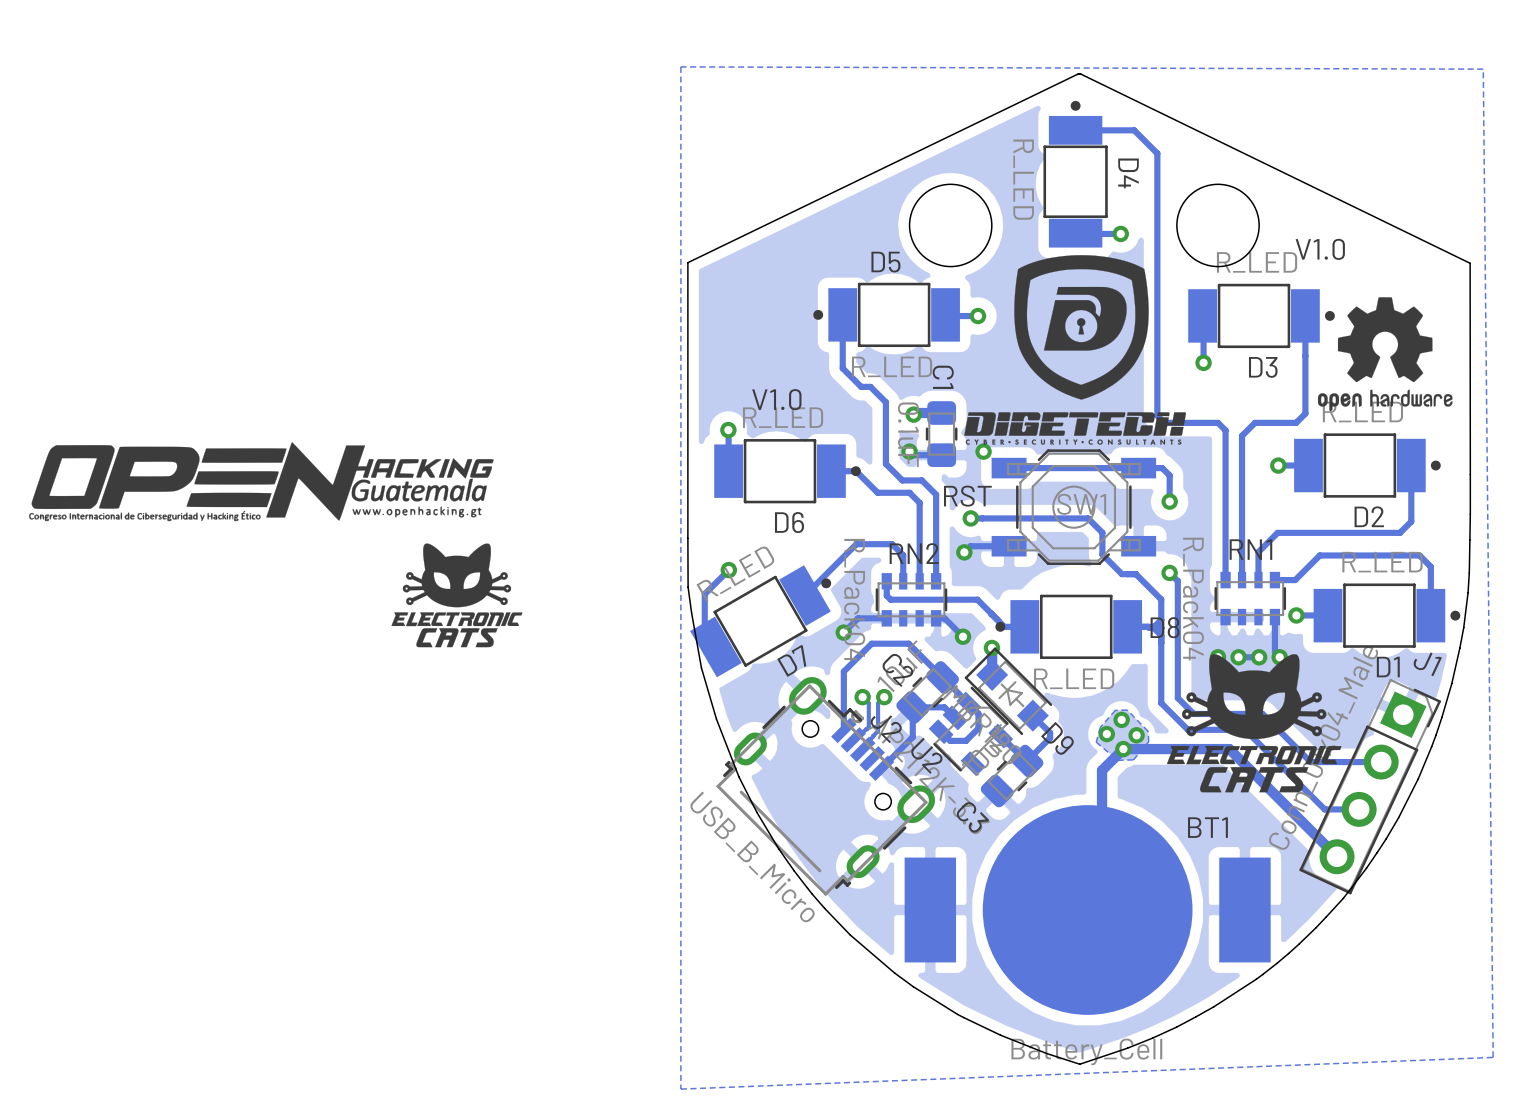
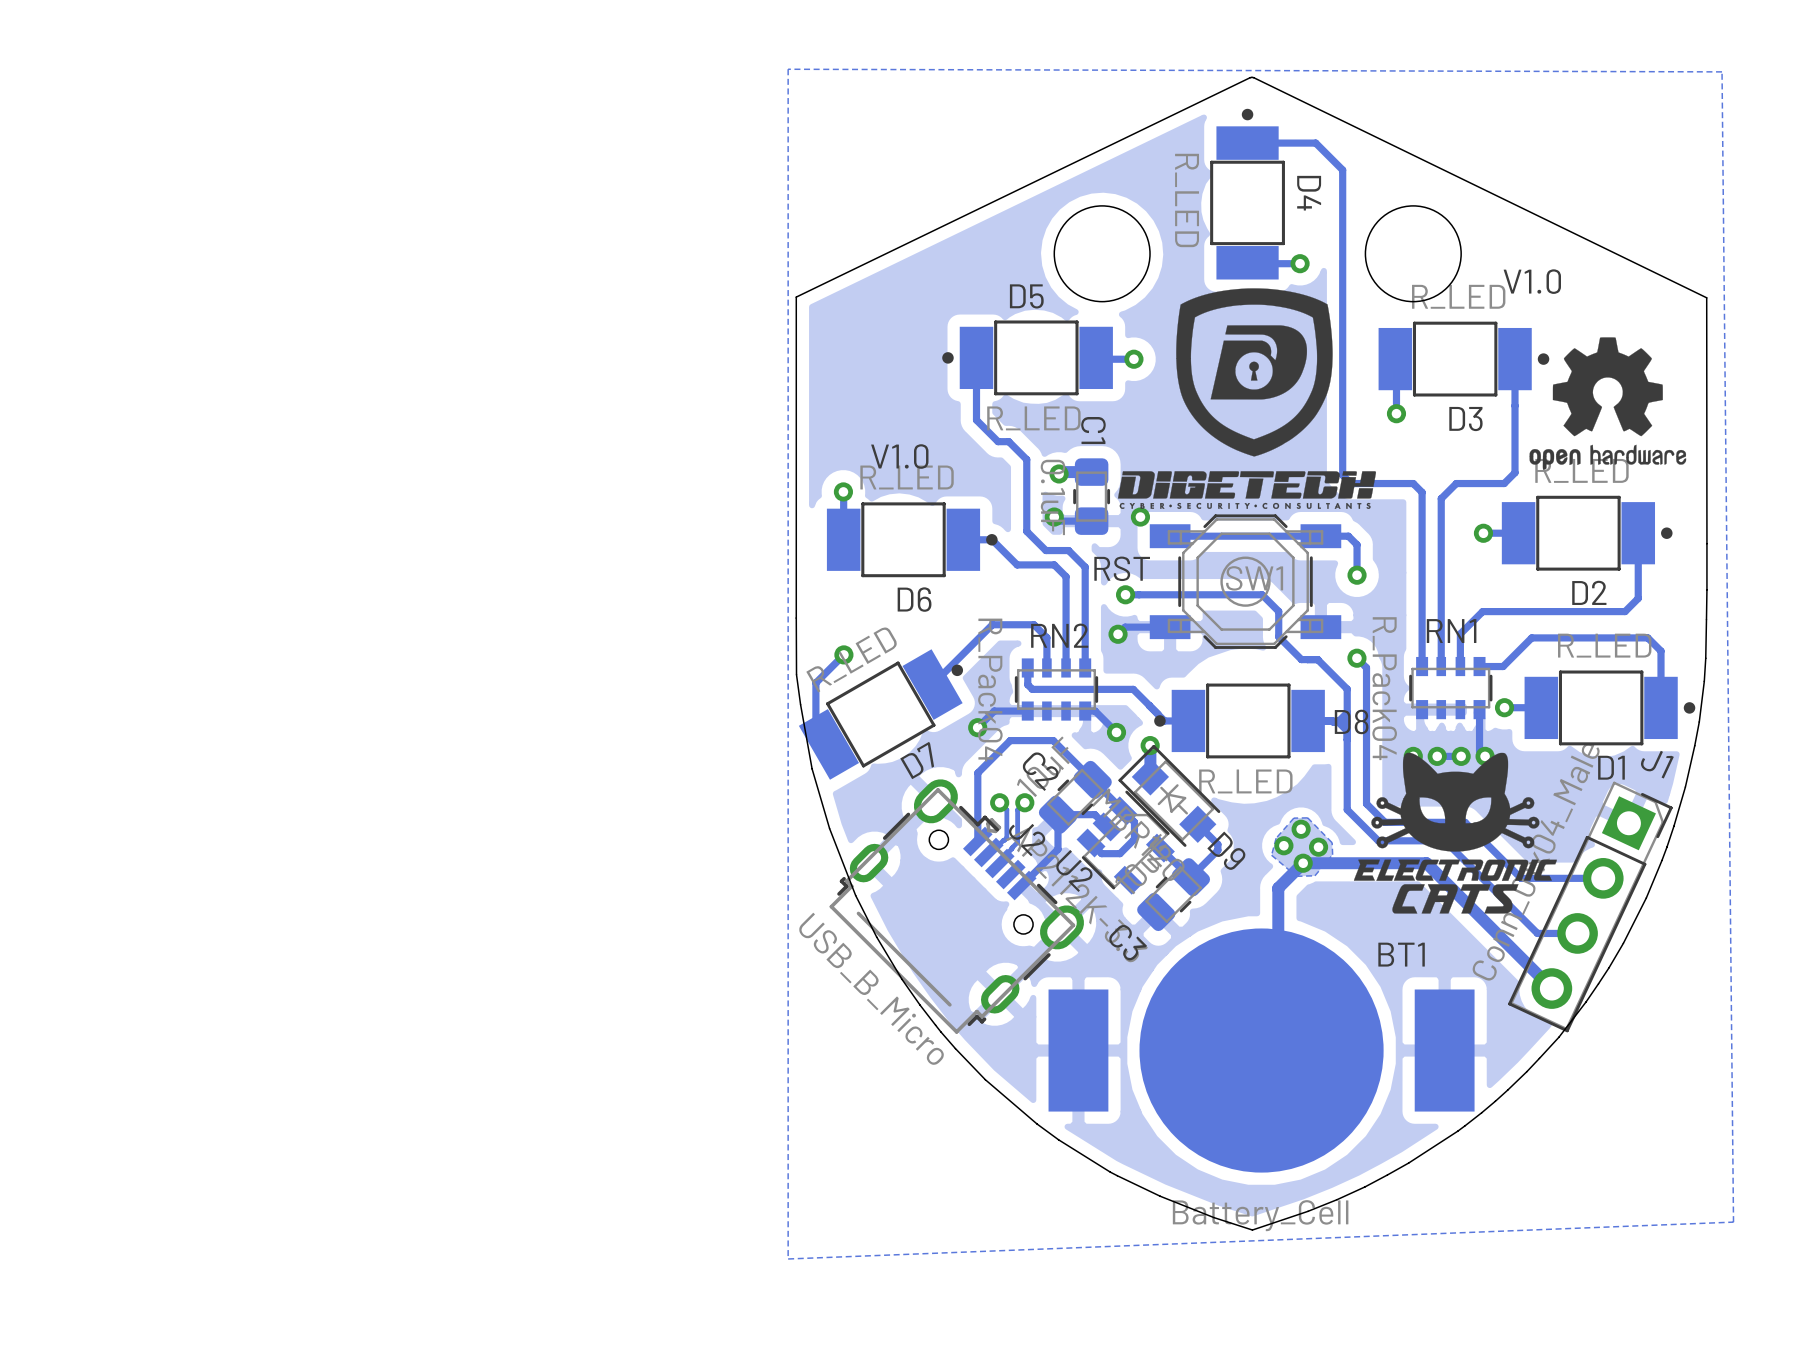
drawing: [29, 442, 523, 648] -> none

